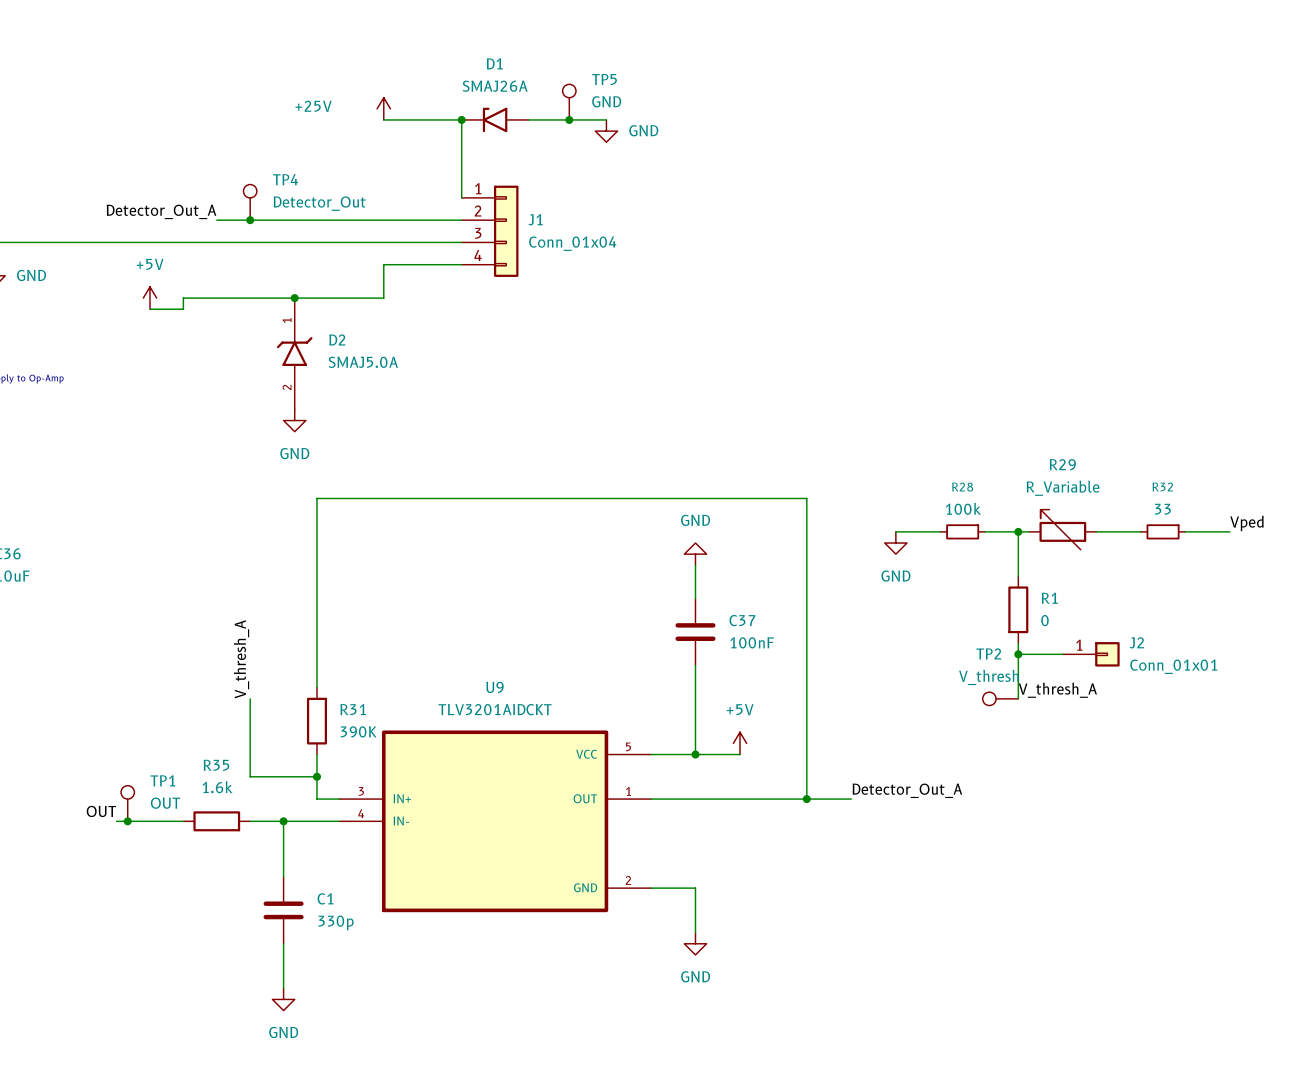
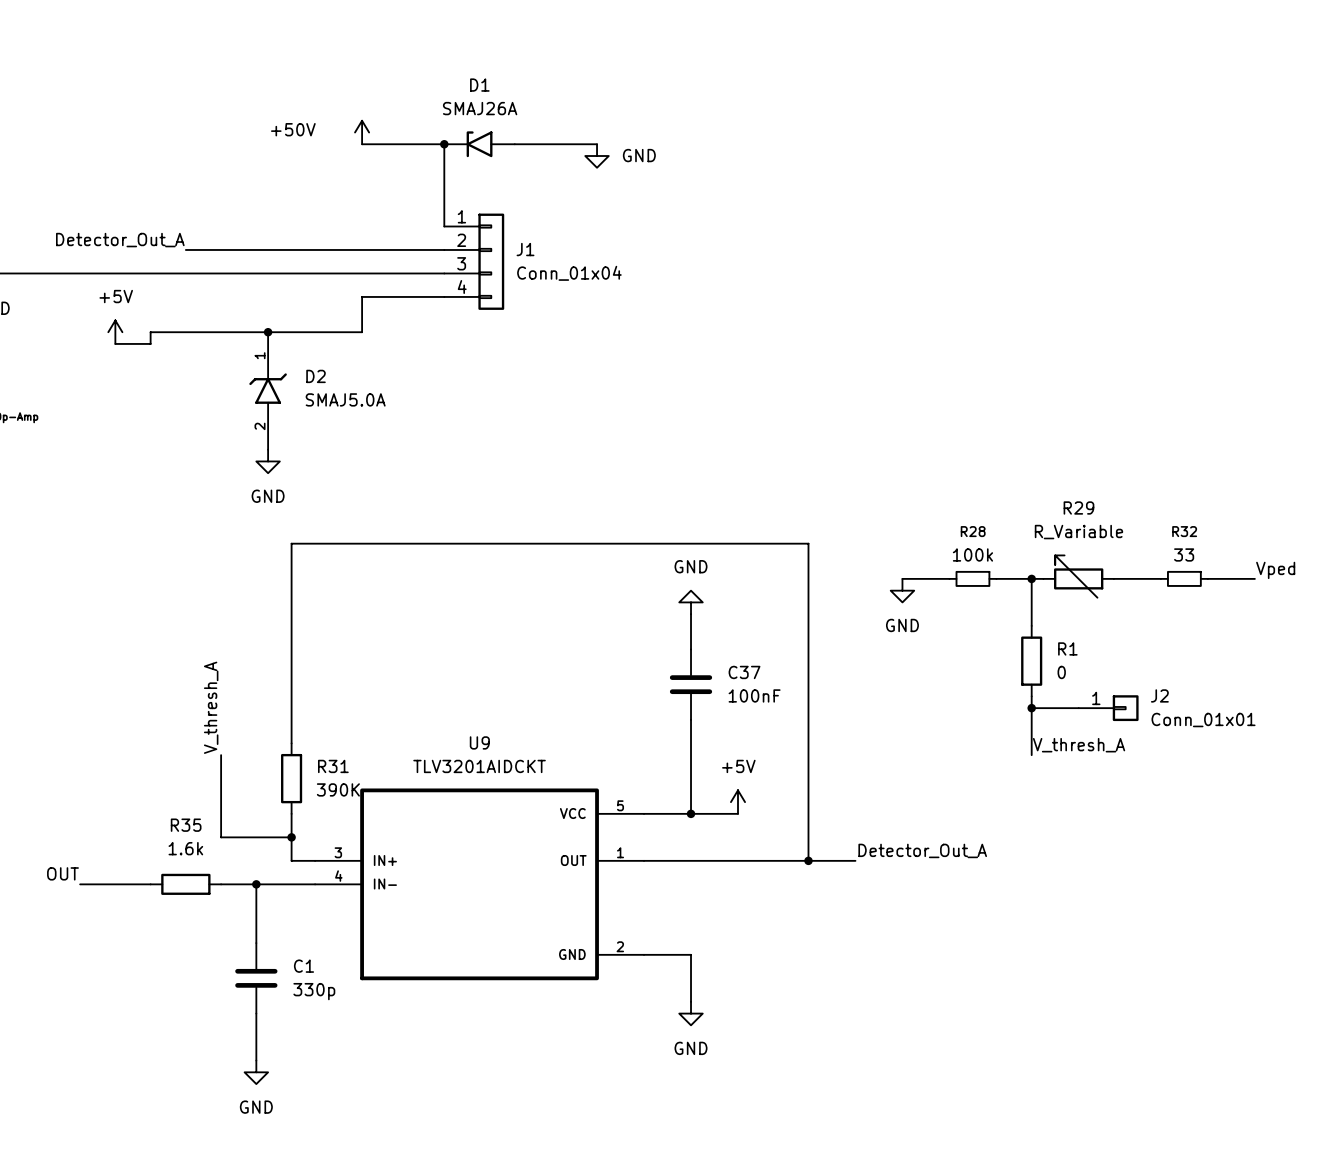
TP5: GND (569, 102) -> none
power symbol: +25V (383, 108) -> +50V (362, 132)
junction: (569, 119) -> none
TP4: Detector_Out (250, 202) -> none
junction: (250, 220) -> none
TP2: V_thresh (1000, 698) -> none
TP1: OUT (127, 803) -> none
junction: (127, 821) -> none

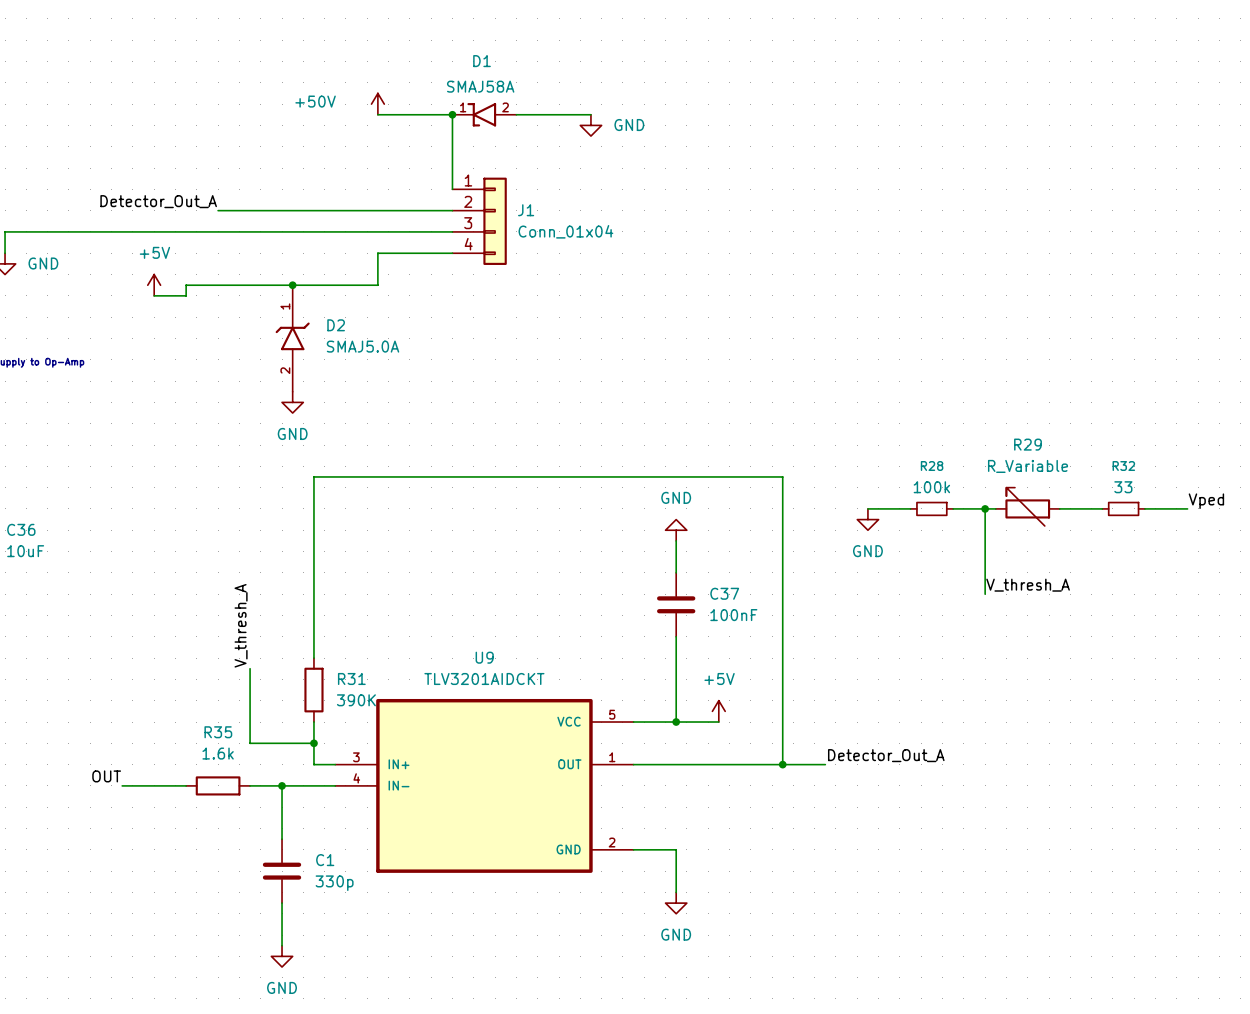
D1 value: SMAJ26A (480, 108) -> SMAJ58A (480, 86)
D1 symbol: [444, 131, 515, 158] -> [452, 103, 517, 127]
wire: none -> (985, 551) (985, 594)
R1: 0 (1031, 661) -> none
wire: (1031, 696) (1031, 755) -> none
wire: (1031, 708) (1078, 708) -> none
junction: (1031, 708) -> none
J2: Conn_01x01 (1108, 708) -> none
label position: V_thresh_A (1079, 745) -> V_thresh_A (1028, 585)

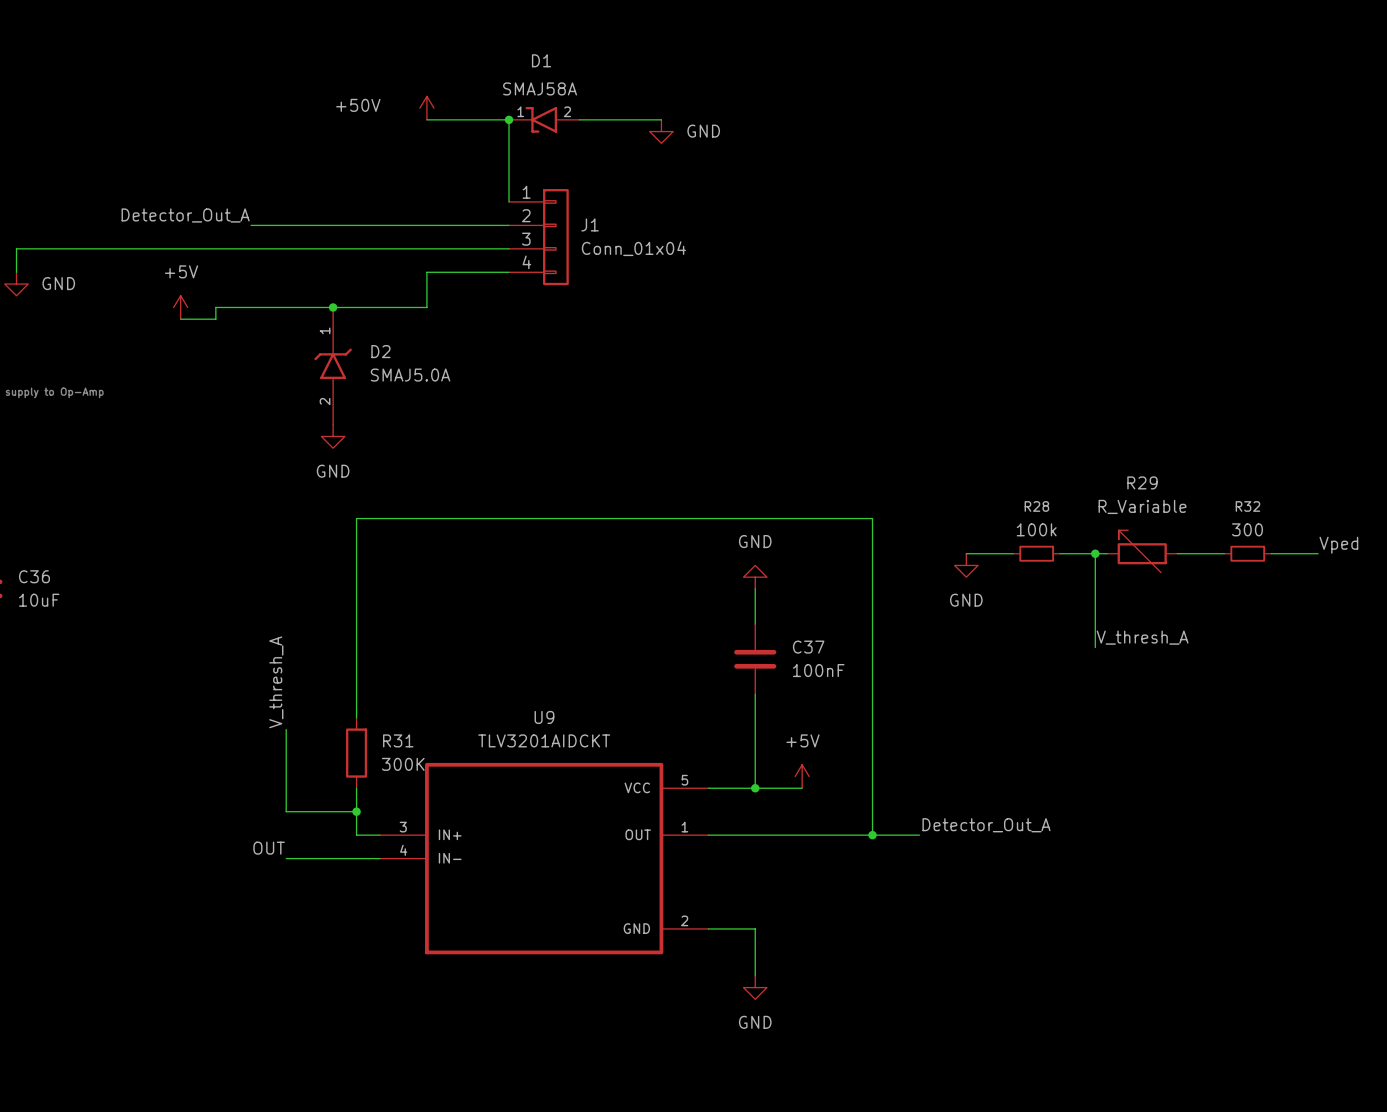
R32 value: 33 (1123, 487) -> 300 (1247, 529)
R31 value: 390K (356, 700) -> 300K (403, 764)
label position: OUT (106, 776) -> OUT (269, 848)
wire: (122, 785) (186, 785) -> none
R35: 1.6k (218, 785) -> none
wire: (282, 785) (282, 839) -> none
junction: (282, 785) -> none
C1: 330p (282, 871) -> none
wire: (282, 903) (282, 945) -> none
power symbol: GND (282, 956) -> none

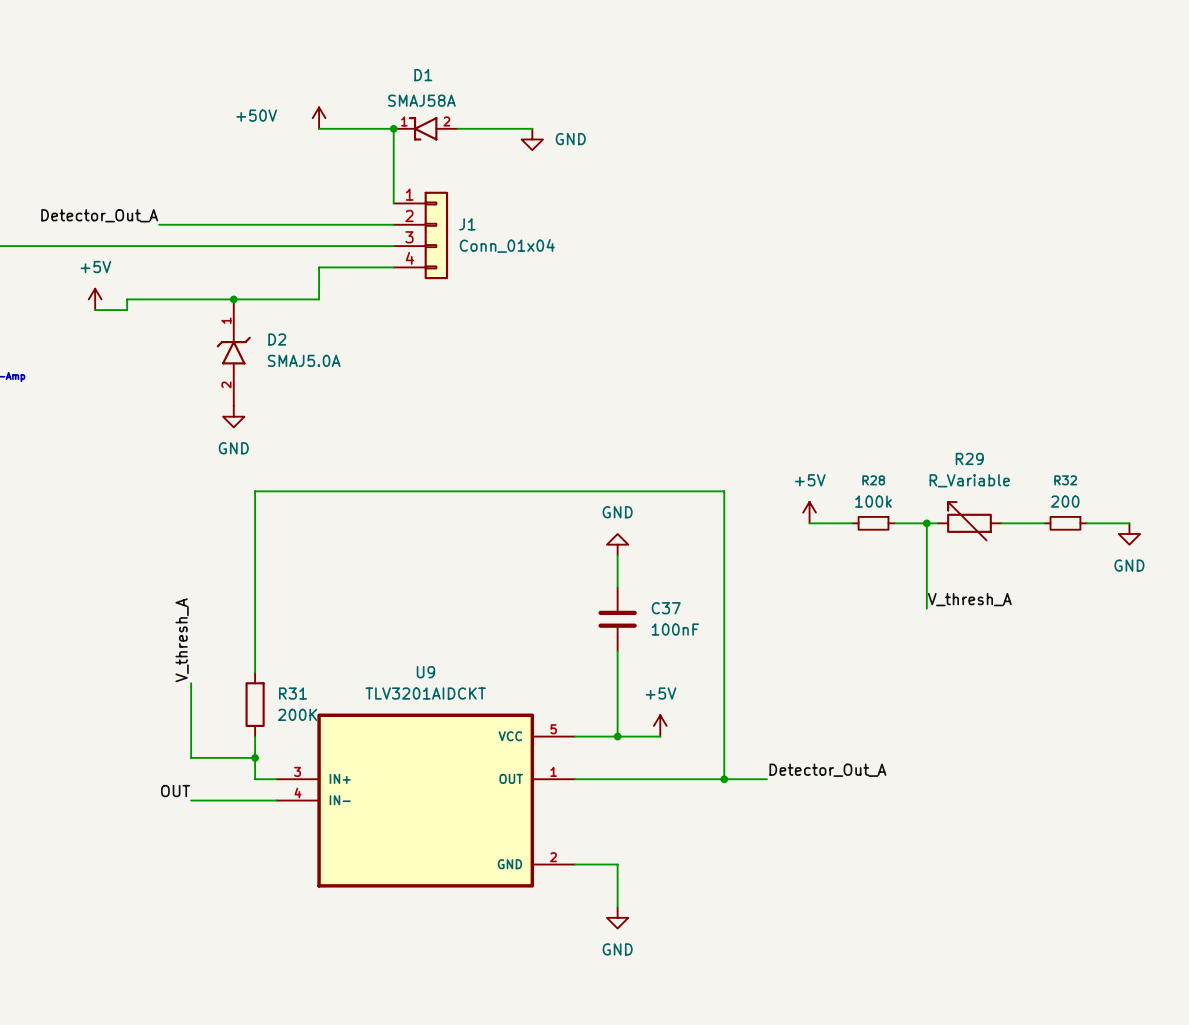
R32 value: 300 (1247, 529) -> 200 (1065, 501)
power symbol: none -> +5V (809, 512)
label: Vped (1338, 545) -> none
power symbol: GND (966, 565) -> none
power symbol: none -> GND (1129, 533)
R31 value: 300K (403, 764) -> 200K (297, 714)

